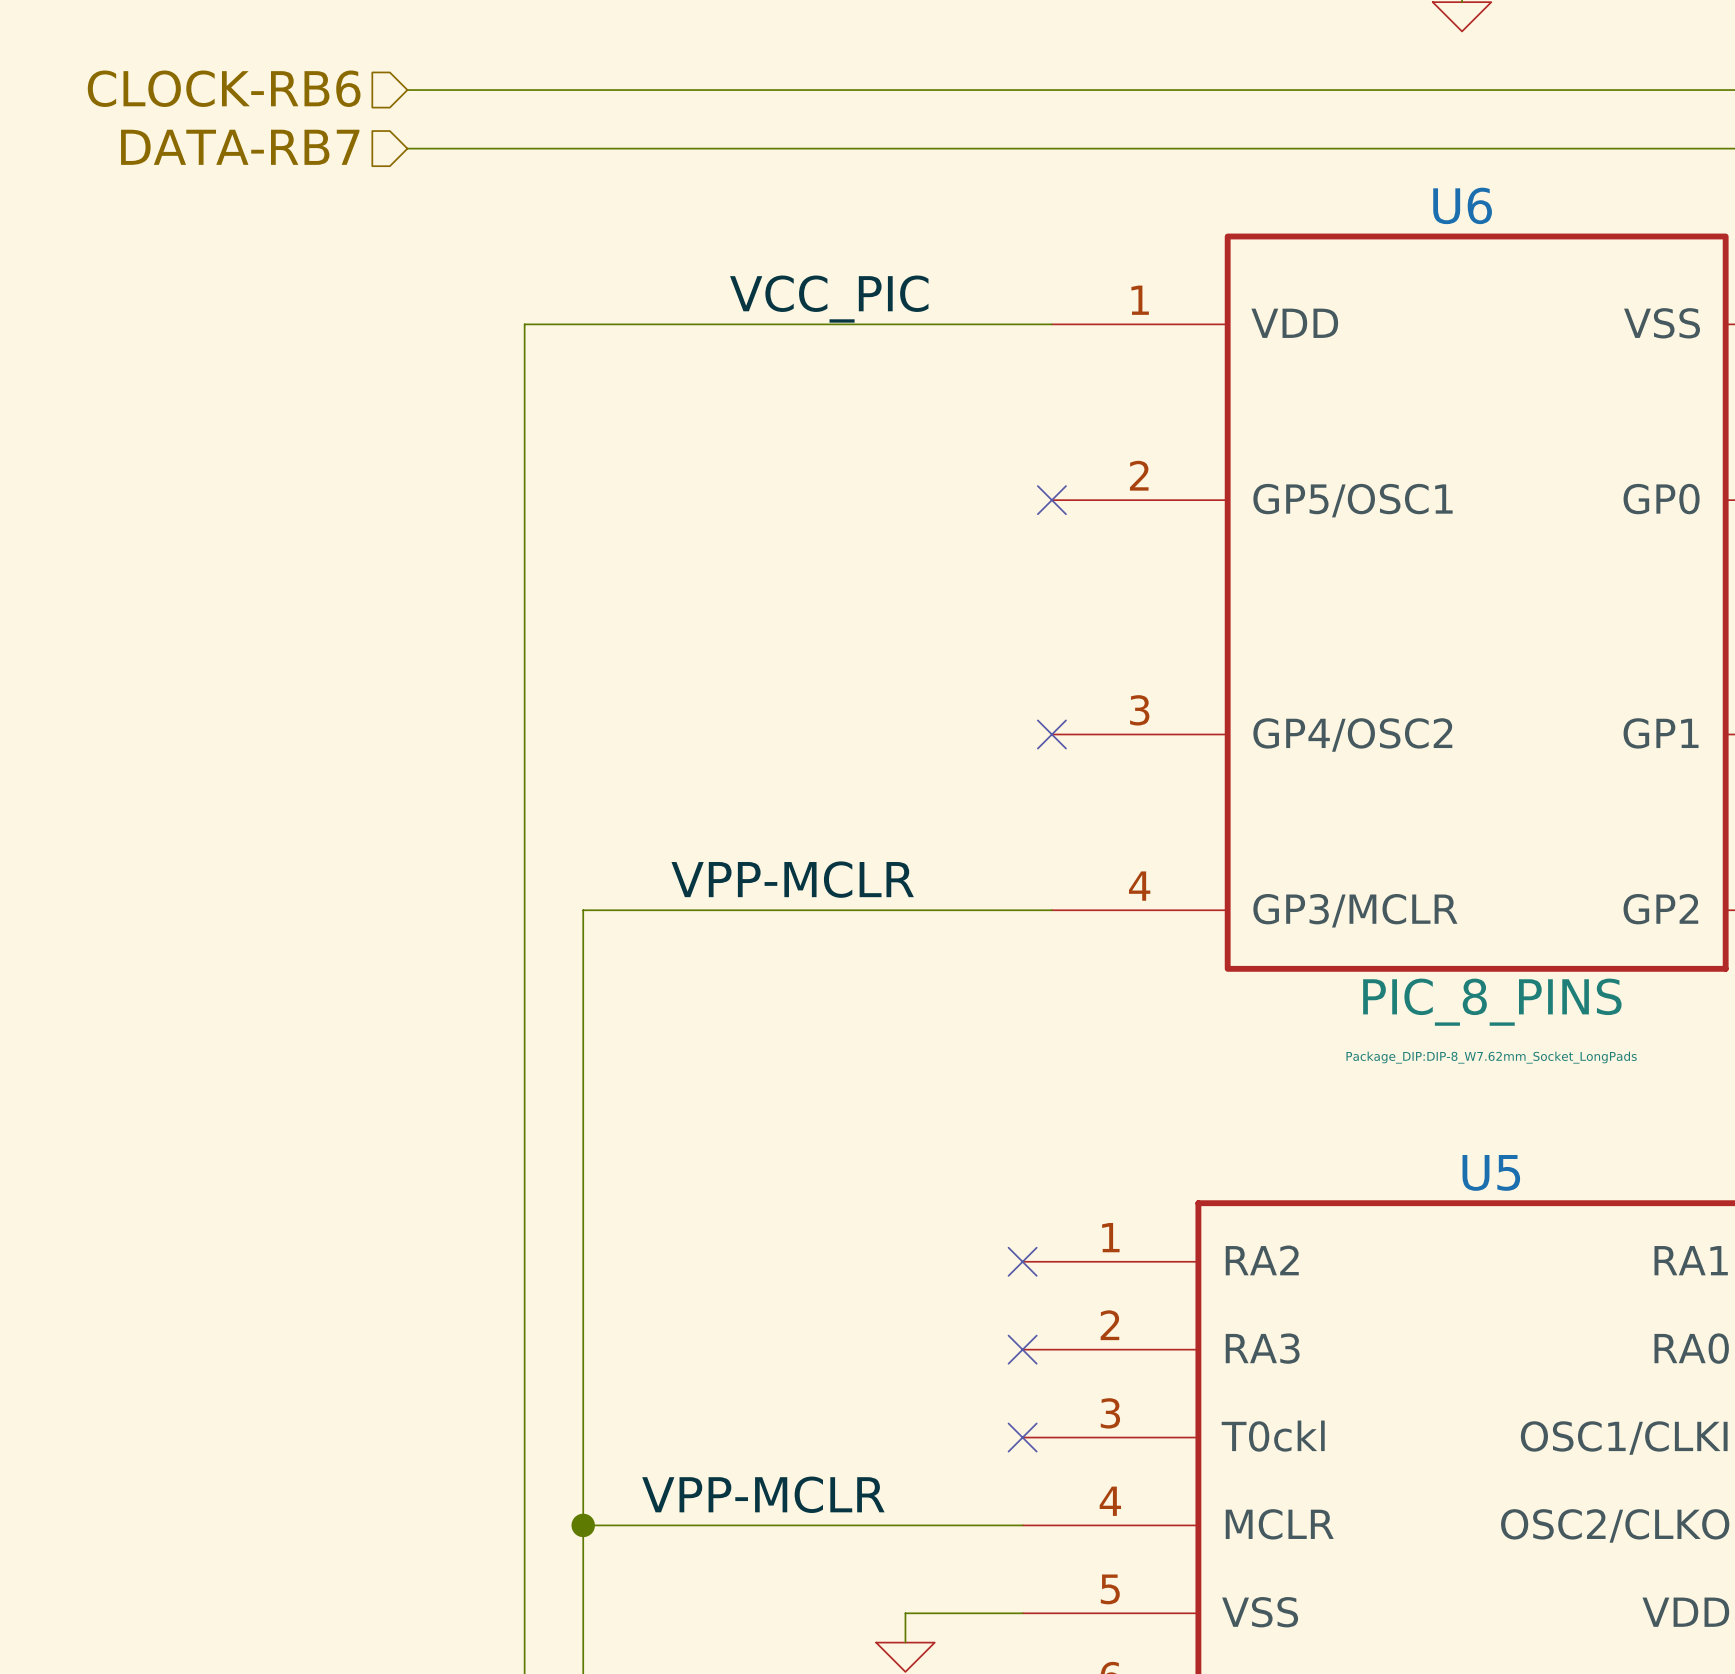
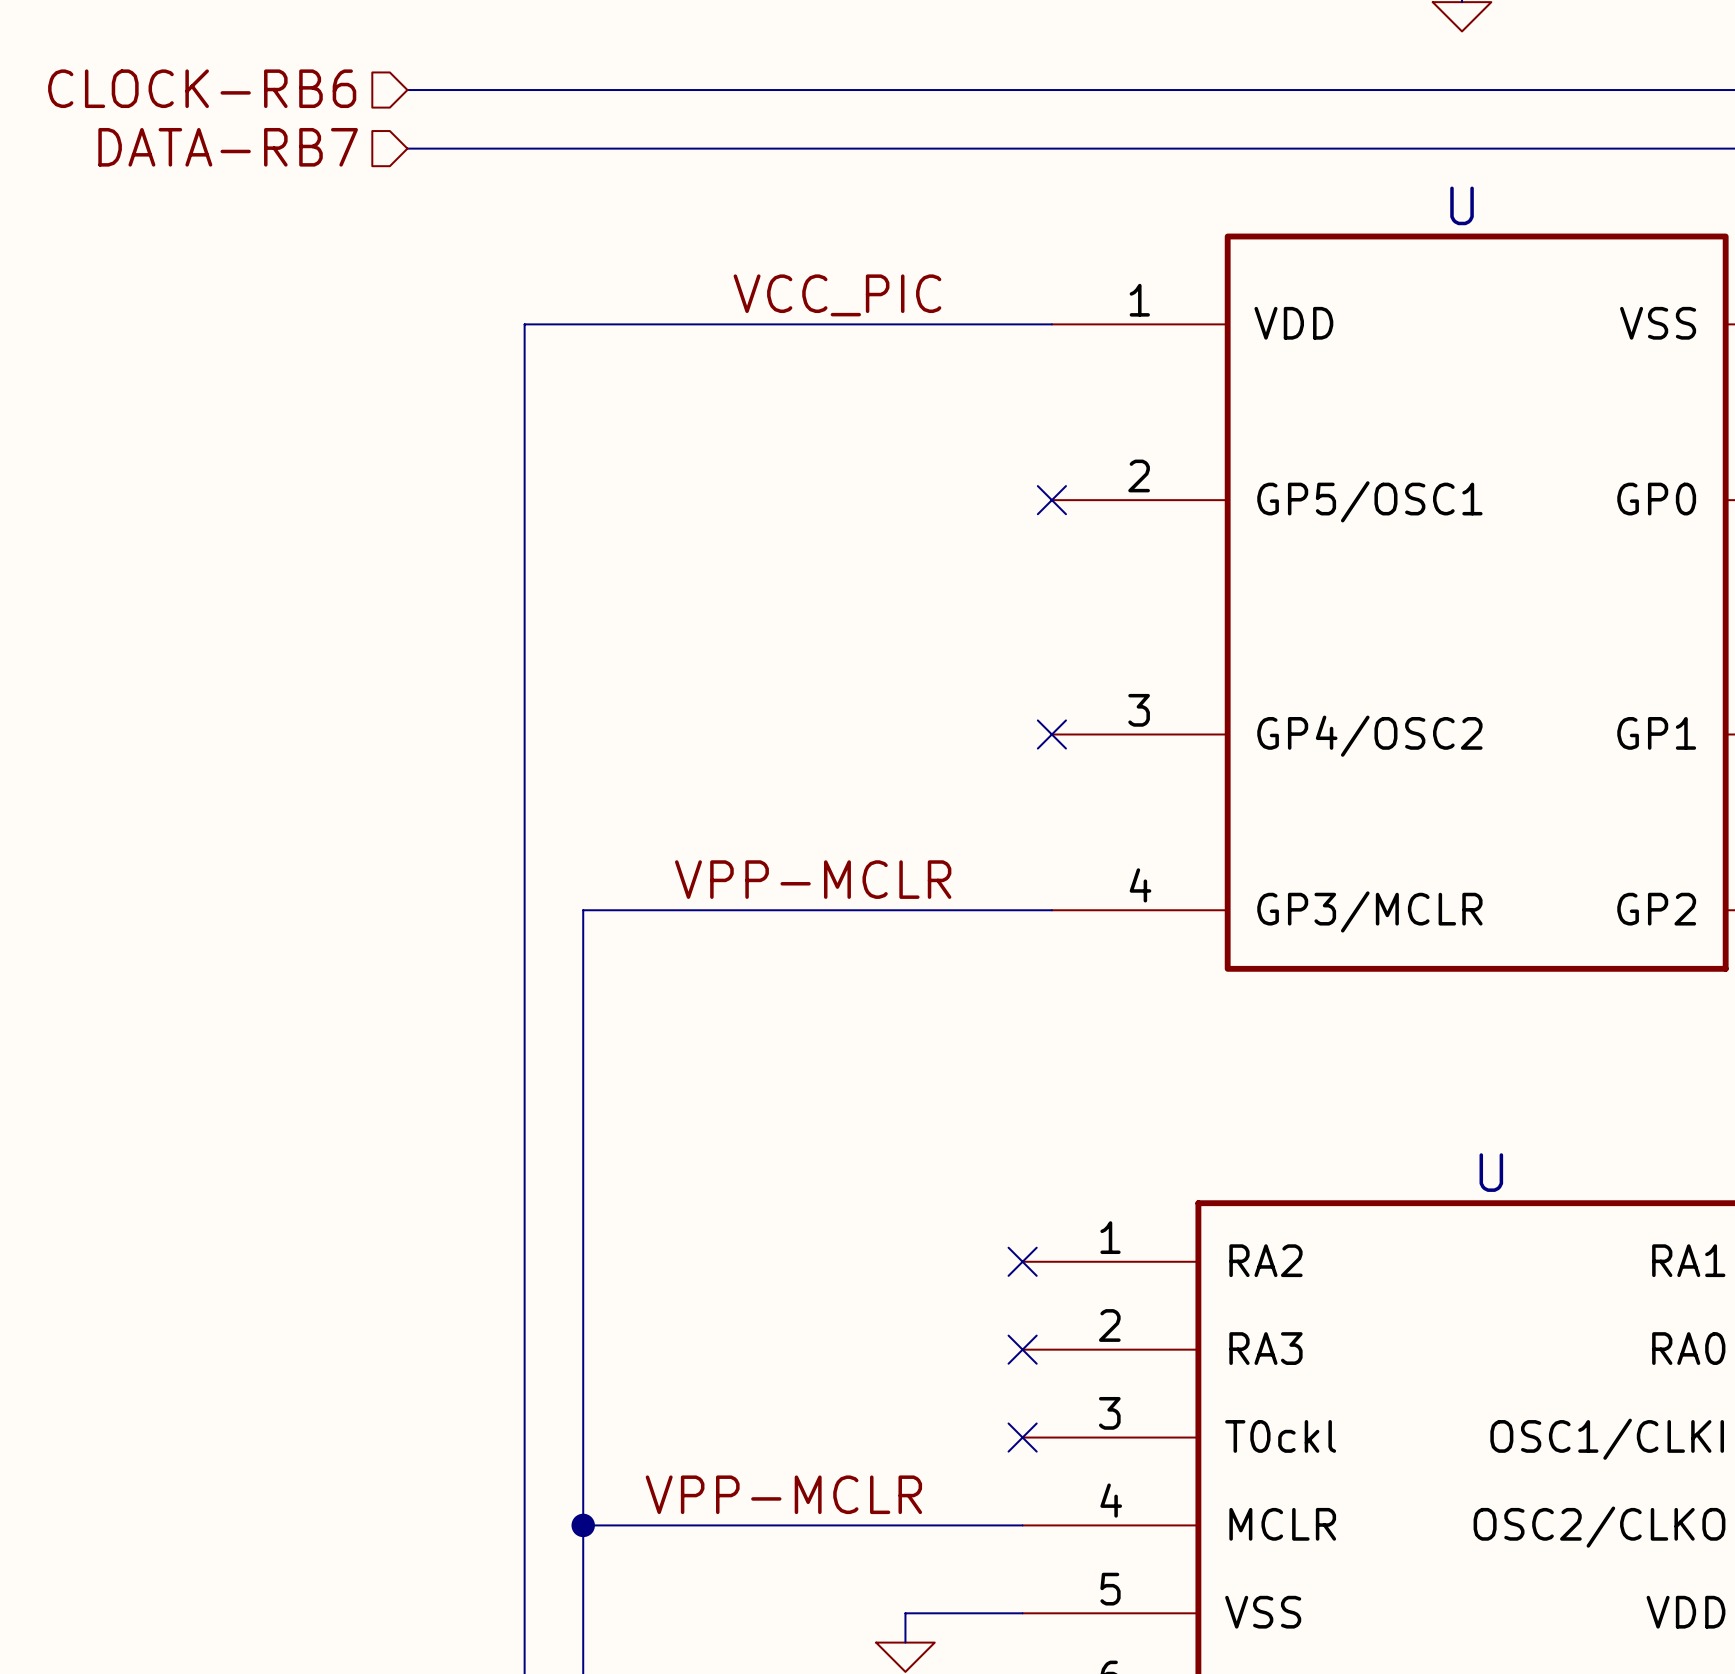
U6 name: U6 (1462, 205) -> U (1462, 205)
U6 value: PIC_8_PINS (1492, 1002) -> none
U6 text: Package_DIP:DIP-8_W7.62mm_Socket_LongPads (1491, 1057) -> none
U5 name: U5 (1491, 1172) -> U (1491, 1172)

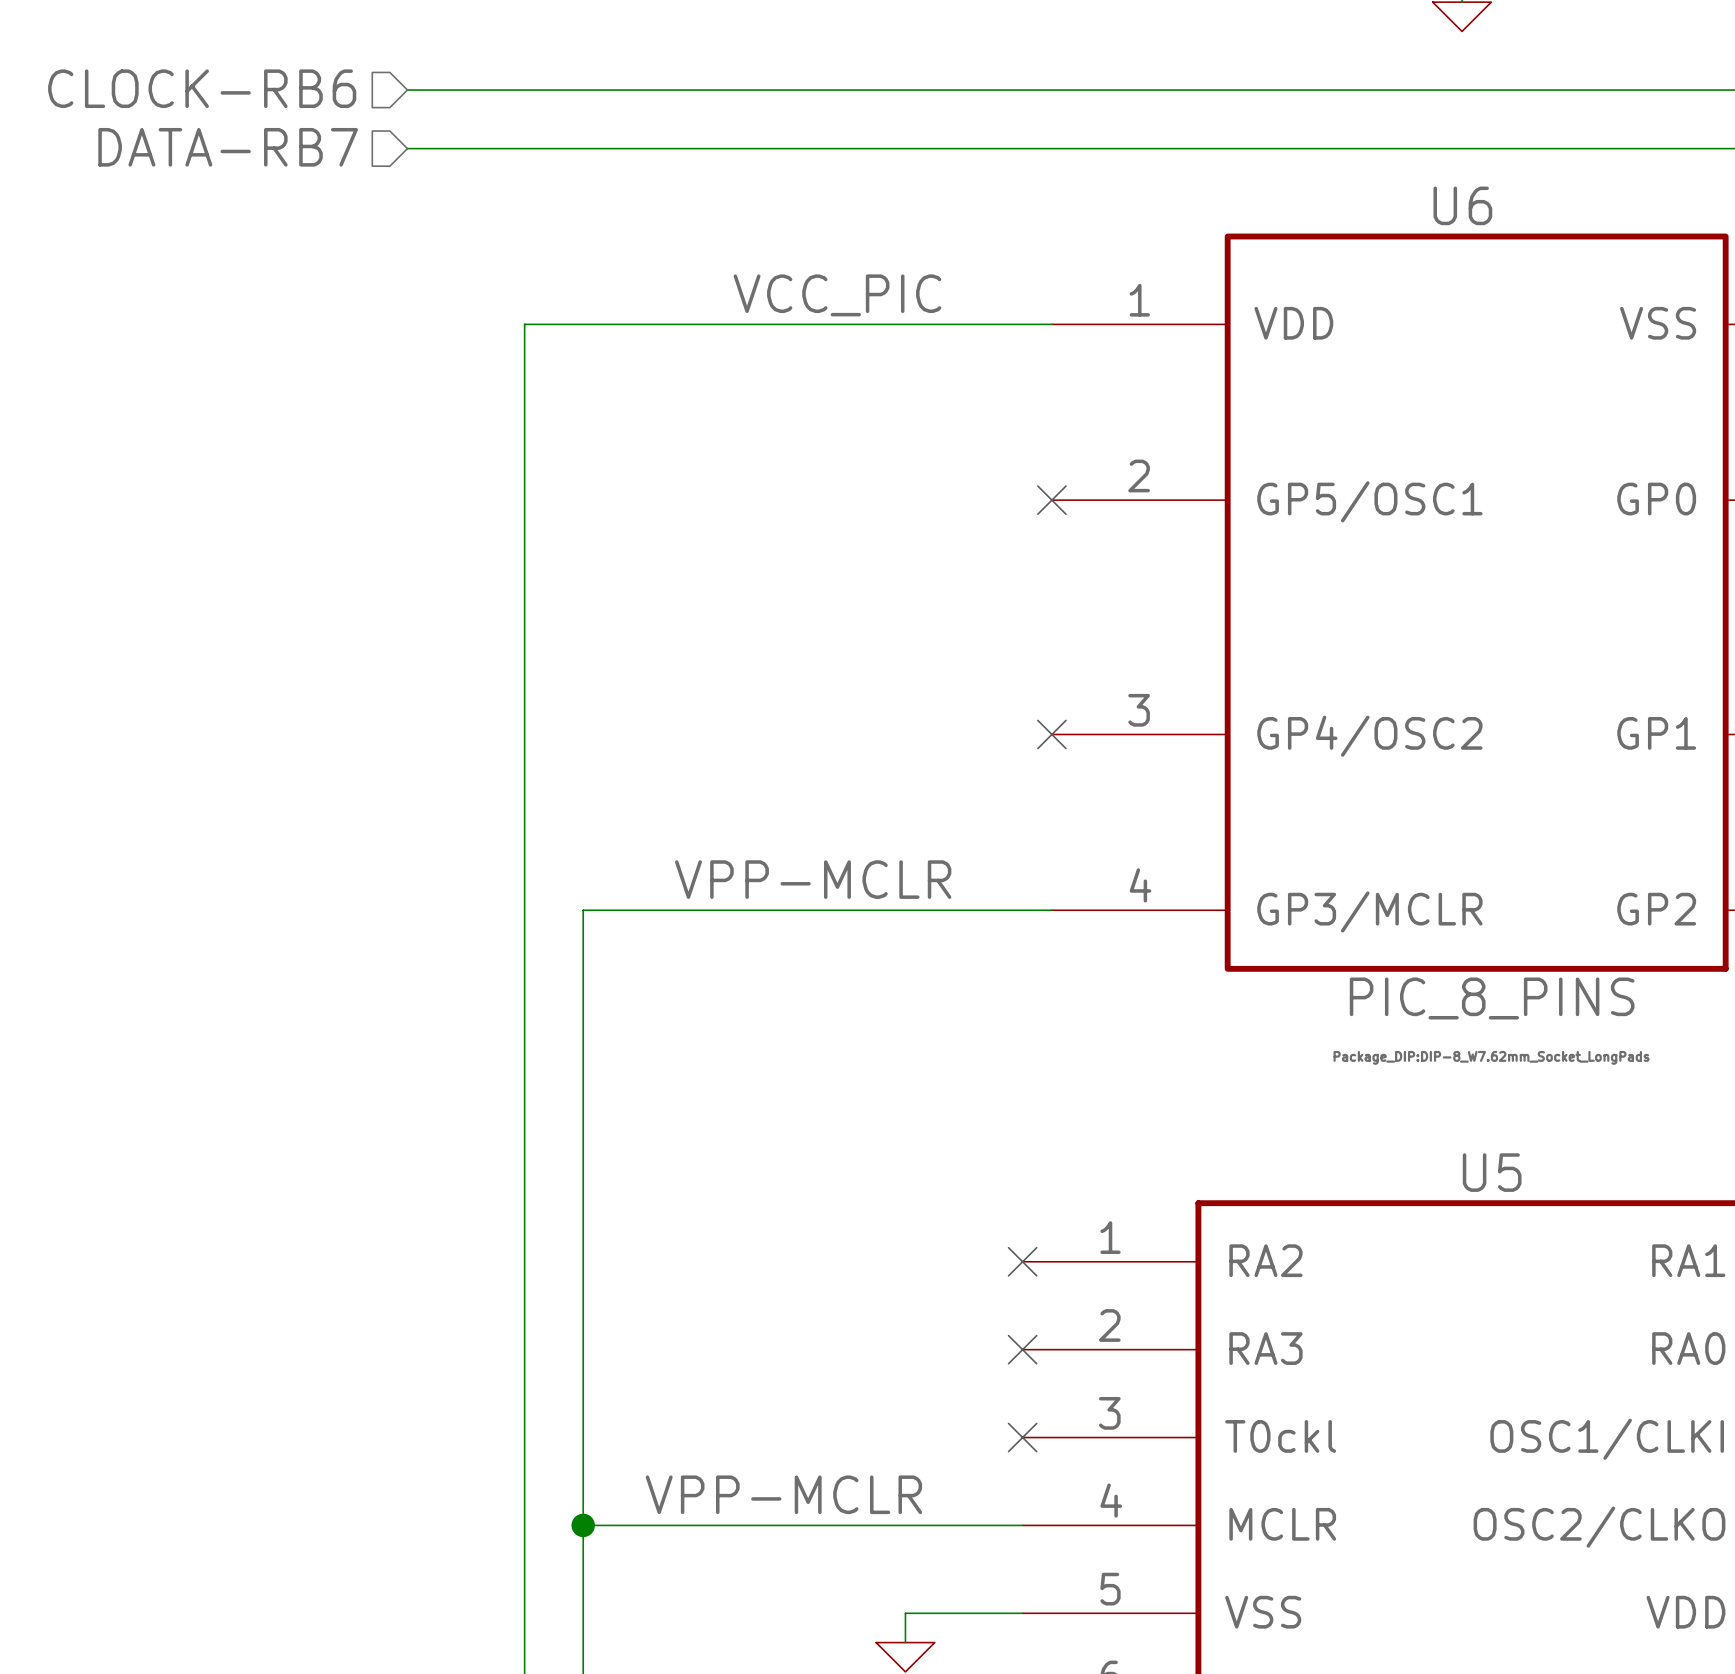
U name: U (1462, 205) -> U6 (1462, 205)
U value: none -> PIC_8_PINS (1492, 998)
U text: none -> Package_DIP:DIP-8_W7.62mm_Socket_LongPads (1491, 1057)
U name: U (1491, 1172) -> U5 (1492, 1172)

